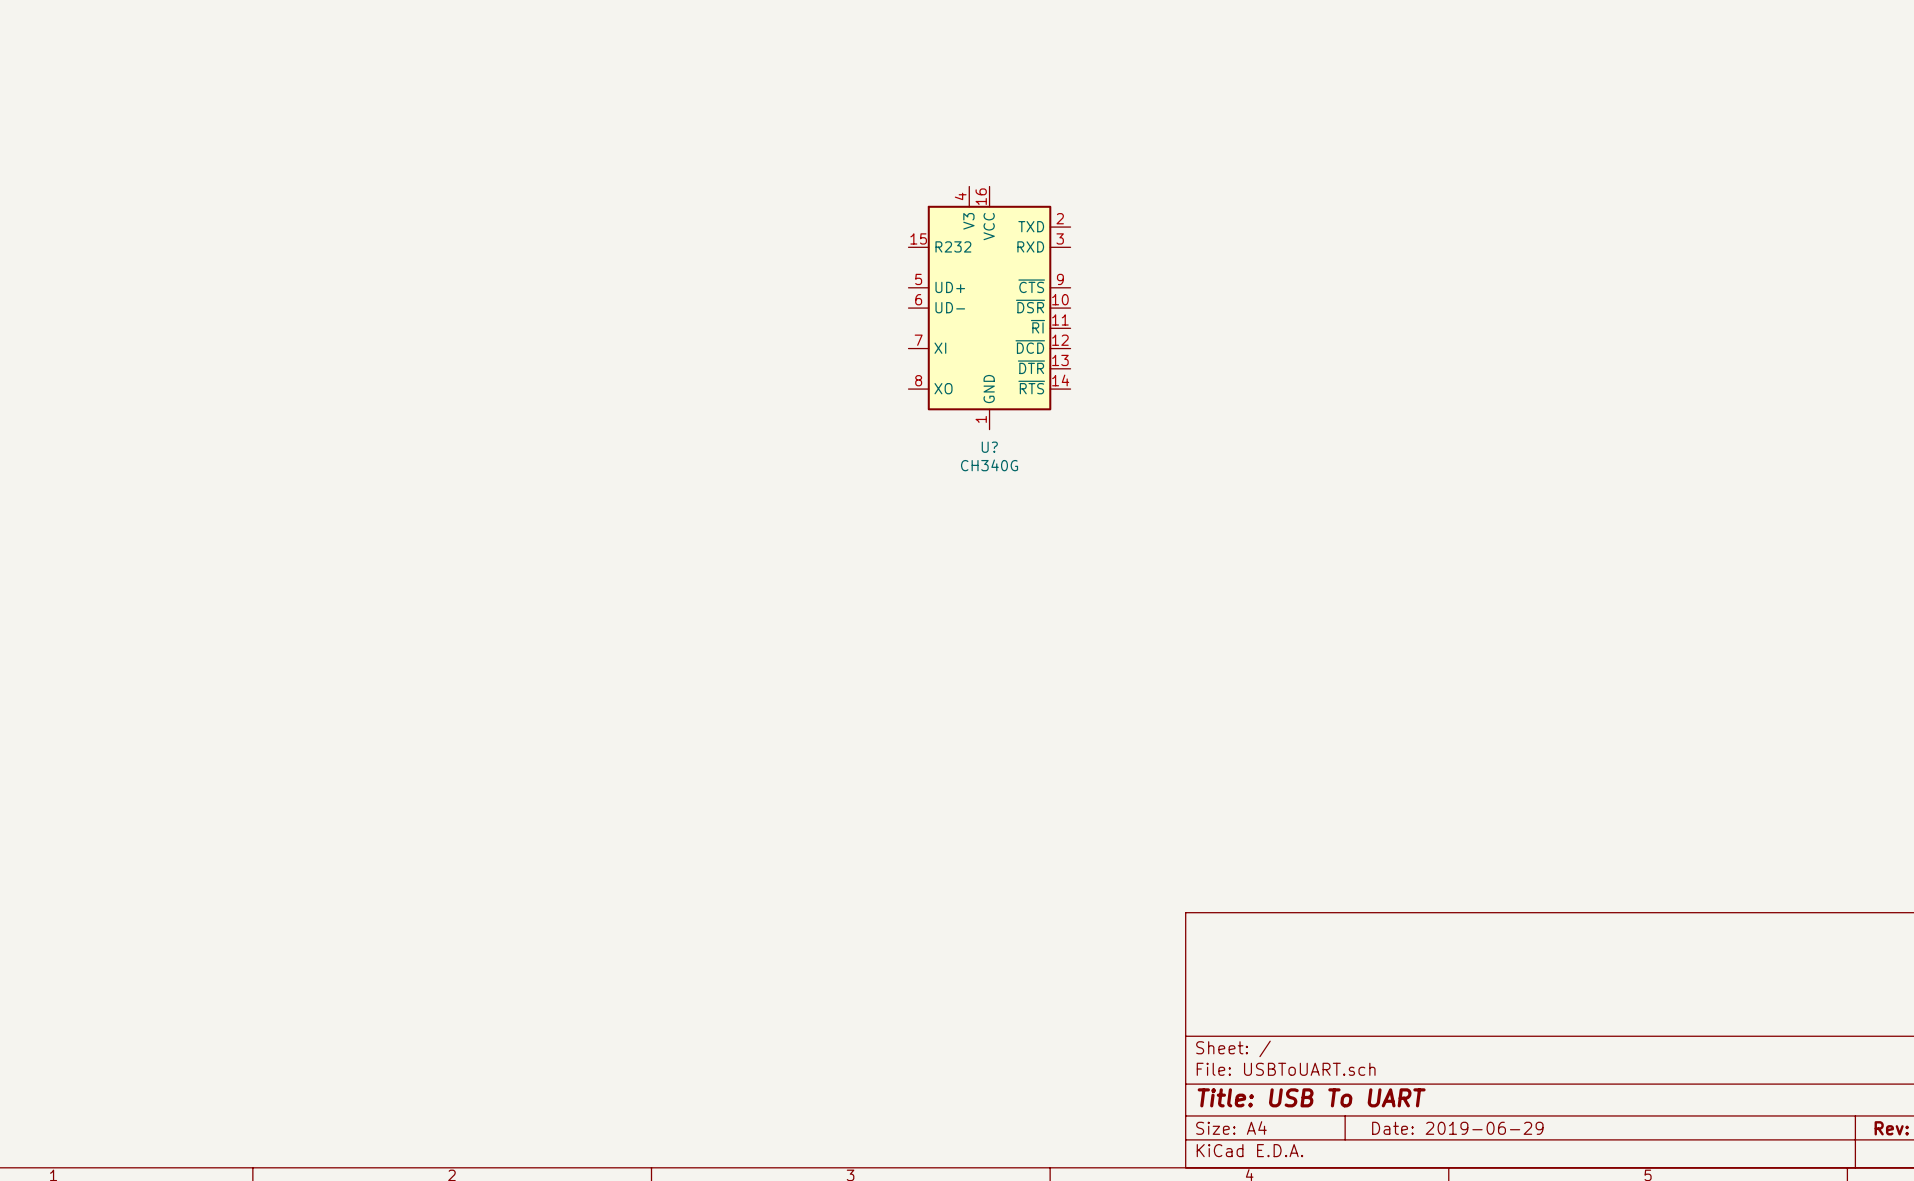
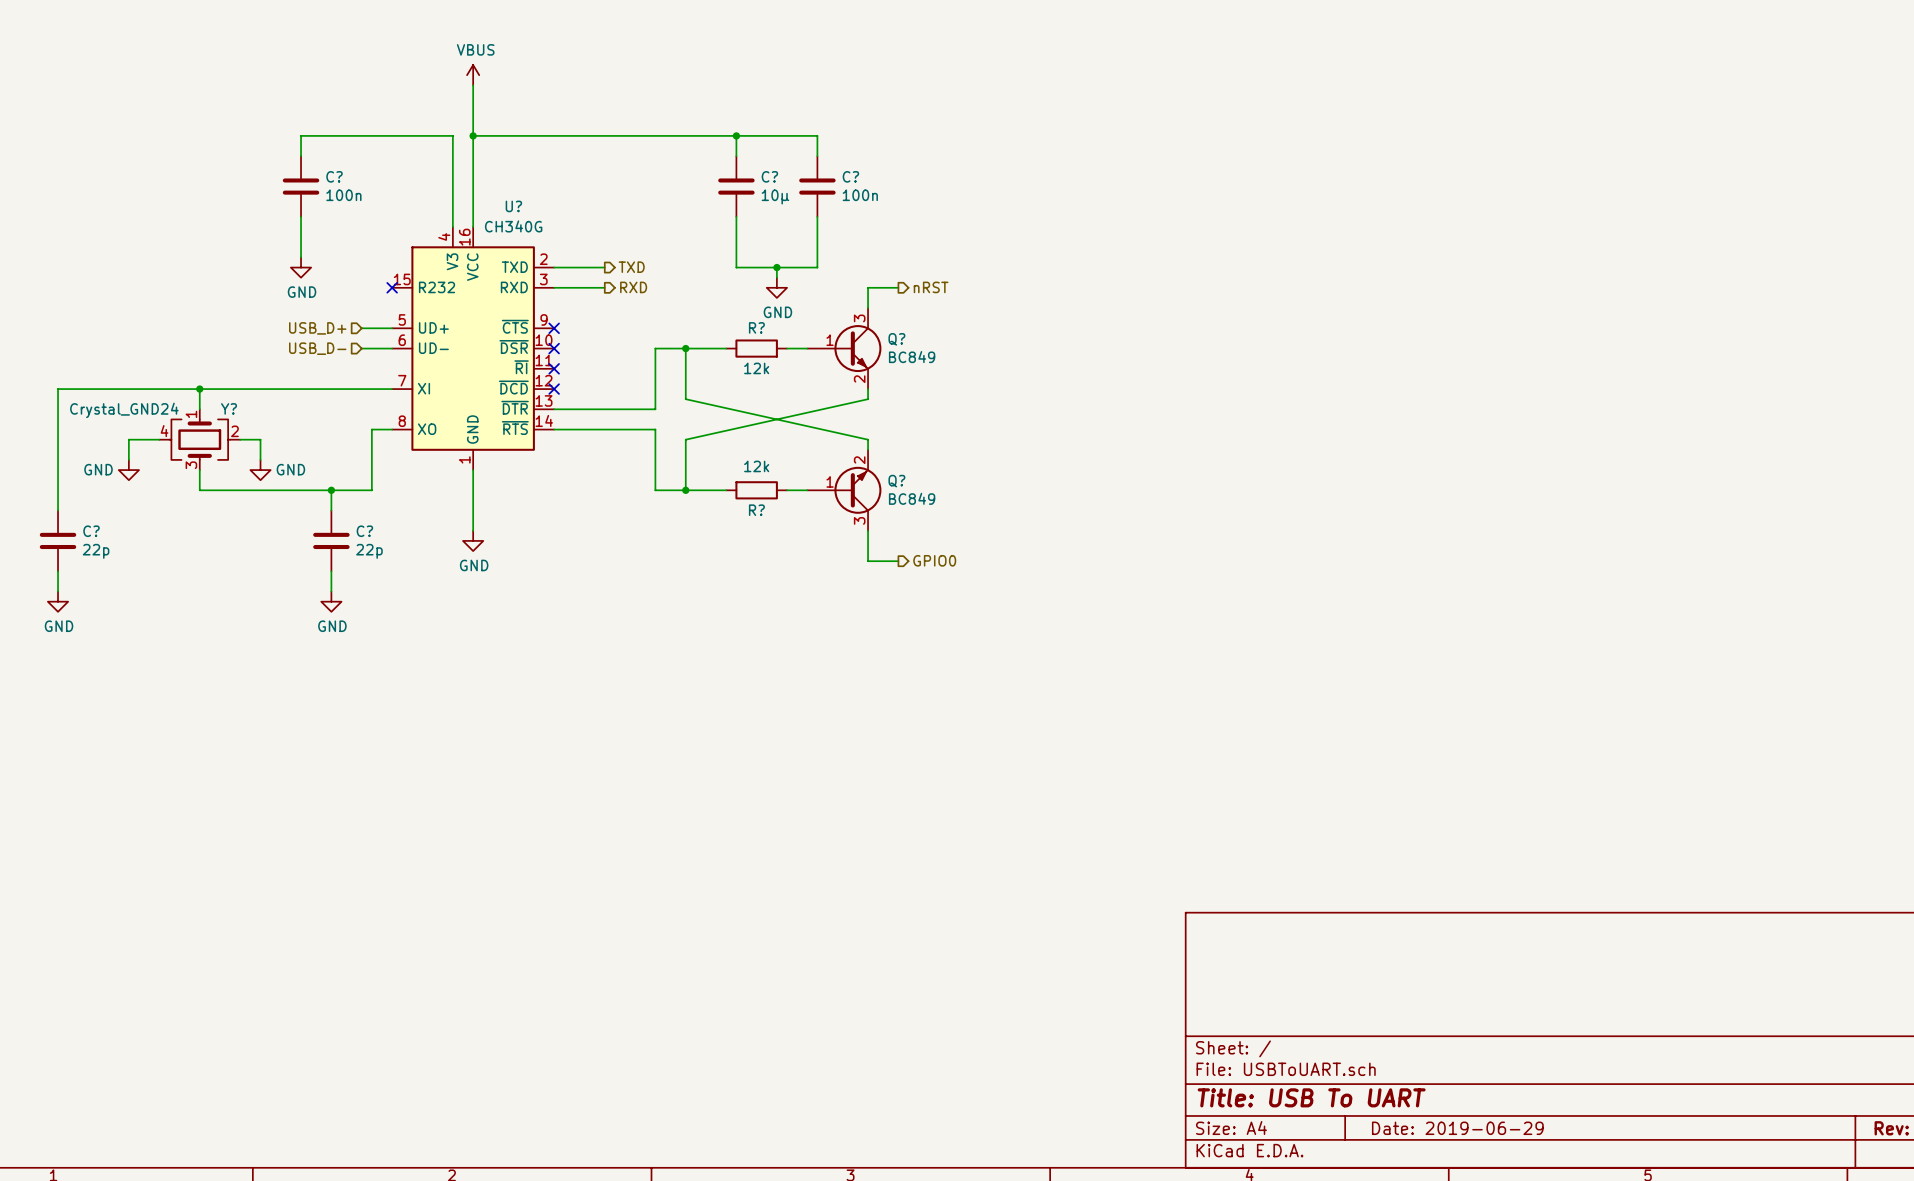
power symbol: none -> VBUS (473, 75)
wire: none -> (473, 85) (473, 227)
wire: none -> (473, 135) (817, 135) (817, 156)
junction: none -> (473, 135)
wire: none -> (736, 135) (736, 156)
junction: none -> (736, 135)
wire: none -> (301, 156) (301, 135) (452, 135) (452, 227)
C?: none -> 100n (301, 186)
C?: none -> 10µ (736, 186)
C?: none -> 100n (817, 186)
wire: none -> (301, 216) (301, 257)
wire: none -> (736, 216) (736, 267) (817, 267) (817, 216)
power symbol: none -> GND (301, 267)
wire: none -> (554, 267) (604, 267)
hierarchical label: none -> TXD (631, 267)
wire: none -> (776, 267) (776, 277)
junction: none -> (776, 267)
no-connect mark: none -> (392, 287)
wire: none -> (554, 287) (604, 287)
hierarchical label: none -> RXD (633, 287)
power symbol: none -> GND (776, 287)
wire: none -> (898, 287) (868, 287) (868, 308)
hierarchical label: none -> nRST (931, 287)
U?: CH340G (989, 308) -> none
hierarchical label: none -> USB_D+ (317, 328)
wire: none -> (361, 328) (392, 328)
no-connect mark: none -> (554, 328)
hierarchical label: none -> USB_D- (317, 348)
wire: none -> (361, 348) (392, 348)
U?: none -> CH340G (473, 348)
no-connect mark: none -> (554, 348)
wire: none -> (685, 348) (685, 399) (868, 439) (868, 449)
junction: none -> (685, 348)
wire: none -> (726, 348) (655, 348) (655, 409) (554, 409)
R?: none -> 12k (756, 348)
wire: none -> (787, 348) (807, 348)
Q?: none -> BC849 (844, 348)
no-connect mark: none -> (554, 368)
wire: none -> (199, 389) (199, 409)
junction: none -> (199, 389)
wire: none -> (392, 389) (58, 389) (58, 510)
no-connect mark: none -> (554, 389)
wire: none -> (868, 389) (868, 399) (685, 439) (685, 490)
wire: none -> (392, 429) (371, 429) (371, 490) (199, 490) (199, 470)
wire: none -> (554, 429) (655, 429) (655, 490) (726, 490)
wire: none -> (159, 439) (128, 439) (128, 459)
Y?: none -> Crystal_GND24 (199, 439)
wire: none -> (240, 439) (260, 439) (260, 459)
power symbol: none -> GND (128, 470)
power symbol: none -> GND (260, 470)
wire: none -> (473, 470) (473, 530)
wire: none -> (331, 490) (331, 510)
junction: none -> (331, 490)
junction: none -> (685, 490)
R?: none -> 12k (756, 490)
wire: none -> (787, 490) (807, 490)
Q?: none -> BC849 (844, 490)
wire: none -> (868, 530) (868, 561) (898, 561)
C?: none -> 22p (58, 540)
C?: none -> 22p (331, 540)
power symbol: none -> GND (473, 540)
hierarchical label: none -> GPIO0 (934, 560)
wire: none -> (58, 571) (58, 591)
wire: none -> (331, 571) (331, 591)
power symbol: none -> GND (58, 601)
power symbol: none -> GND (331, 601)

